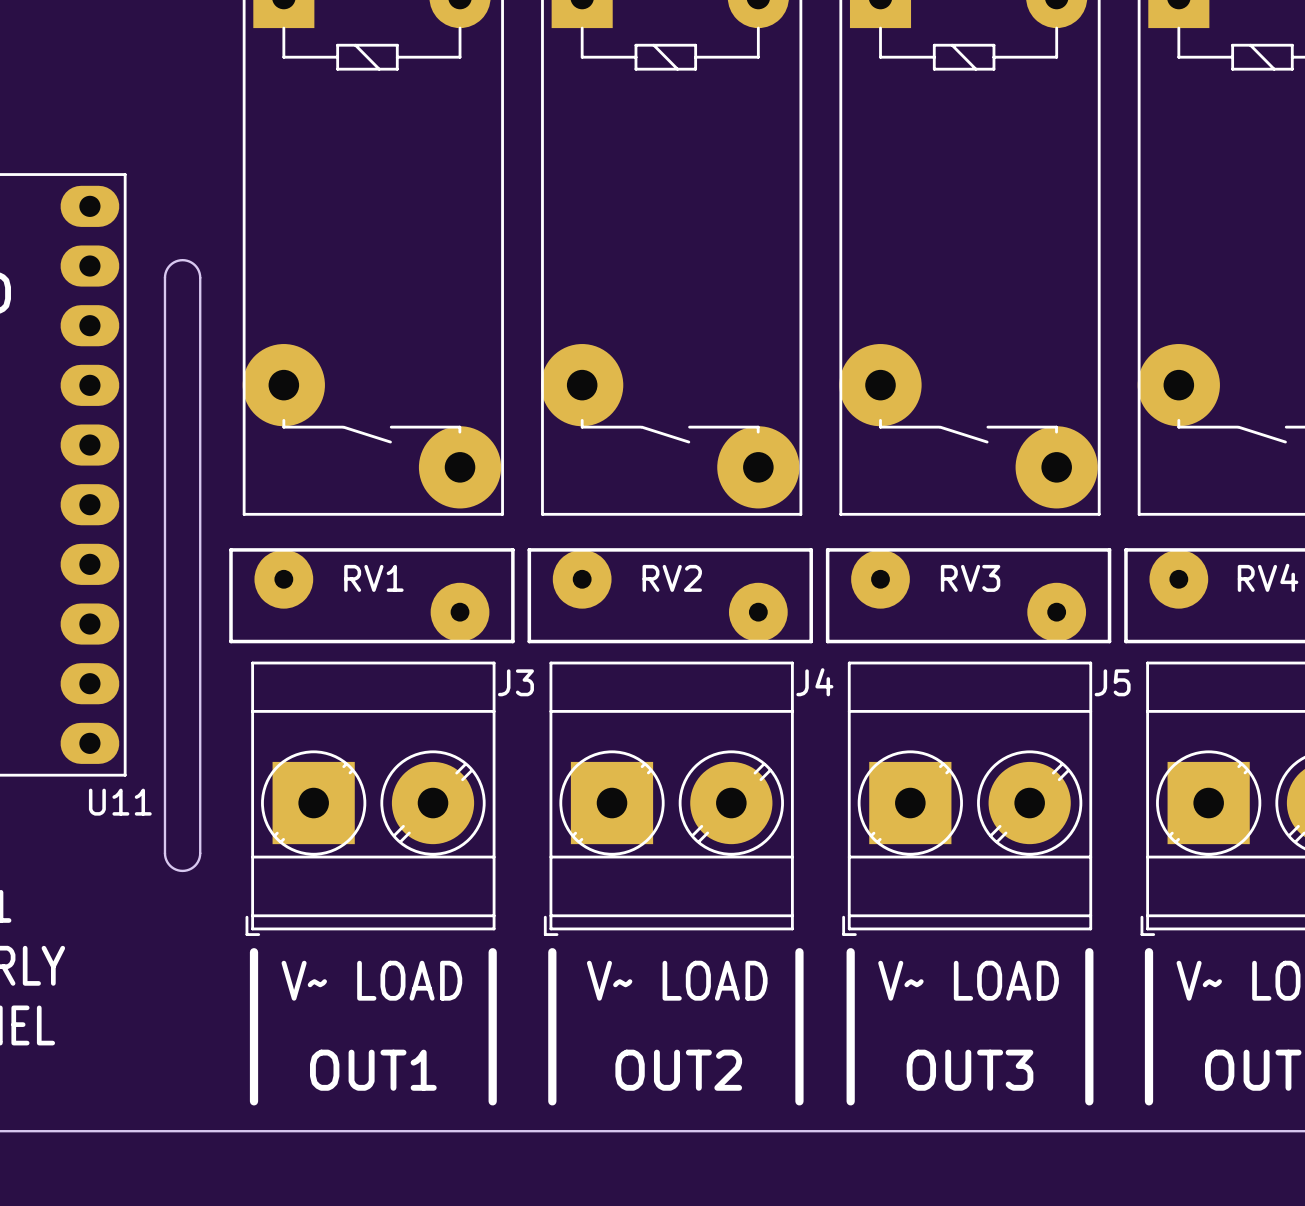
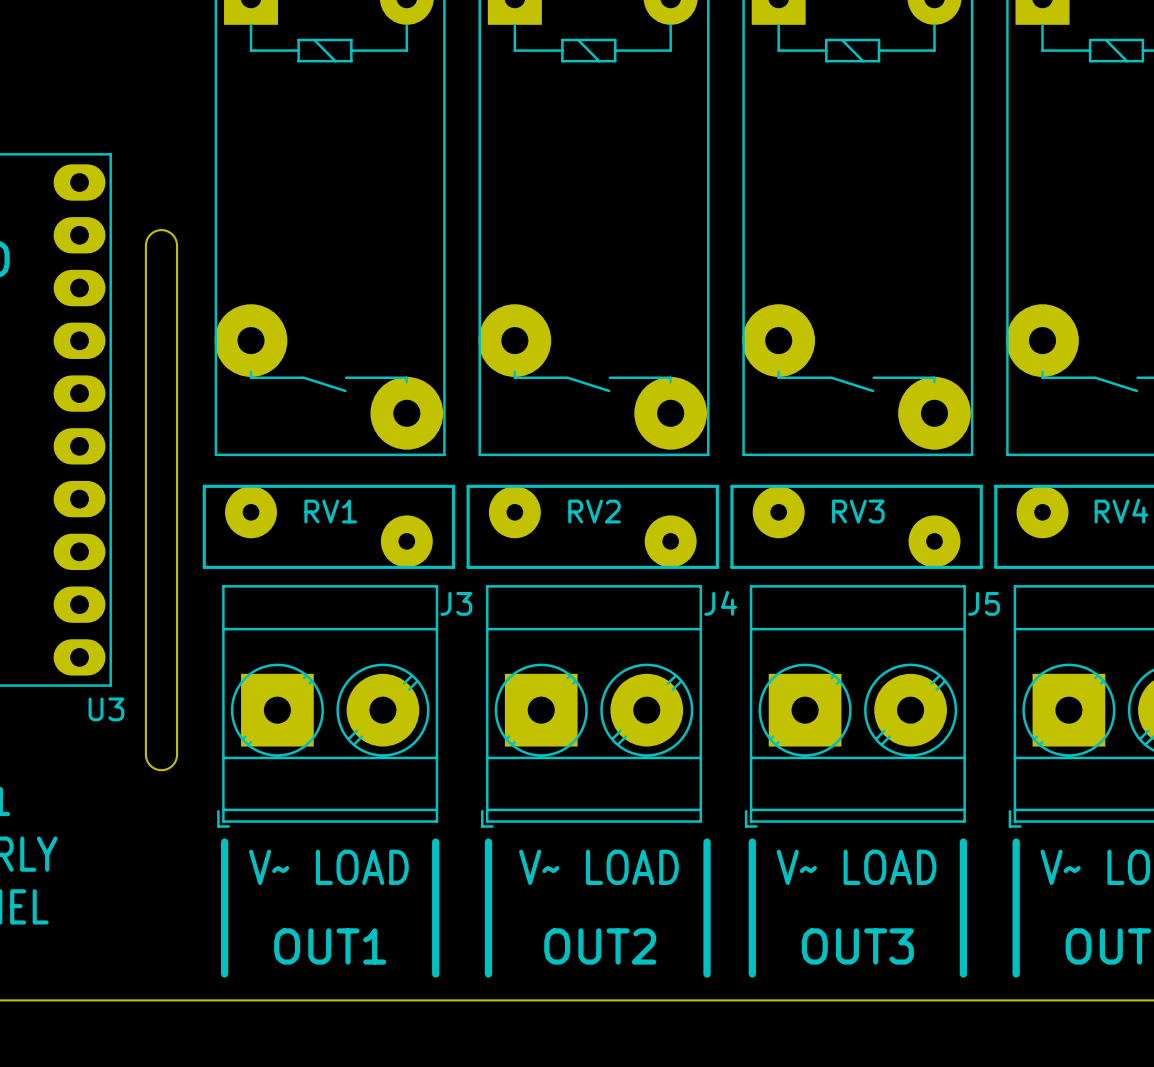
U11 name: U11 (120, 802) -> U3 (106, 709)

